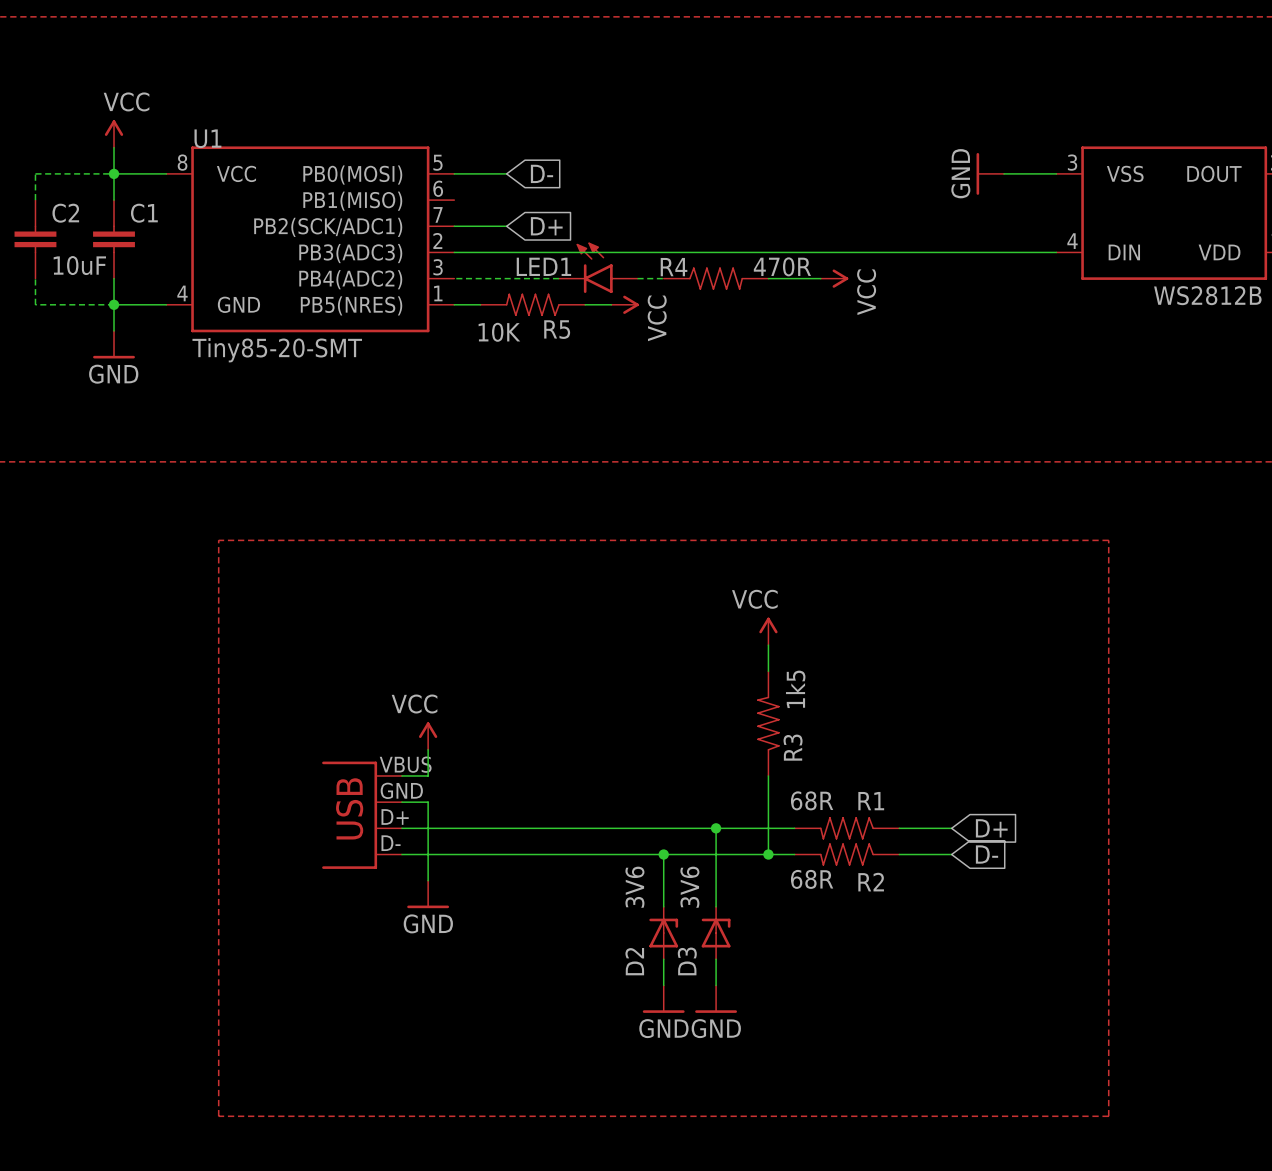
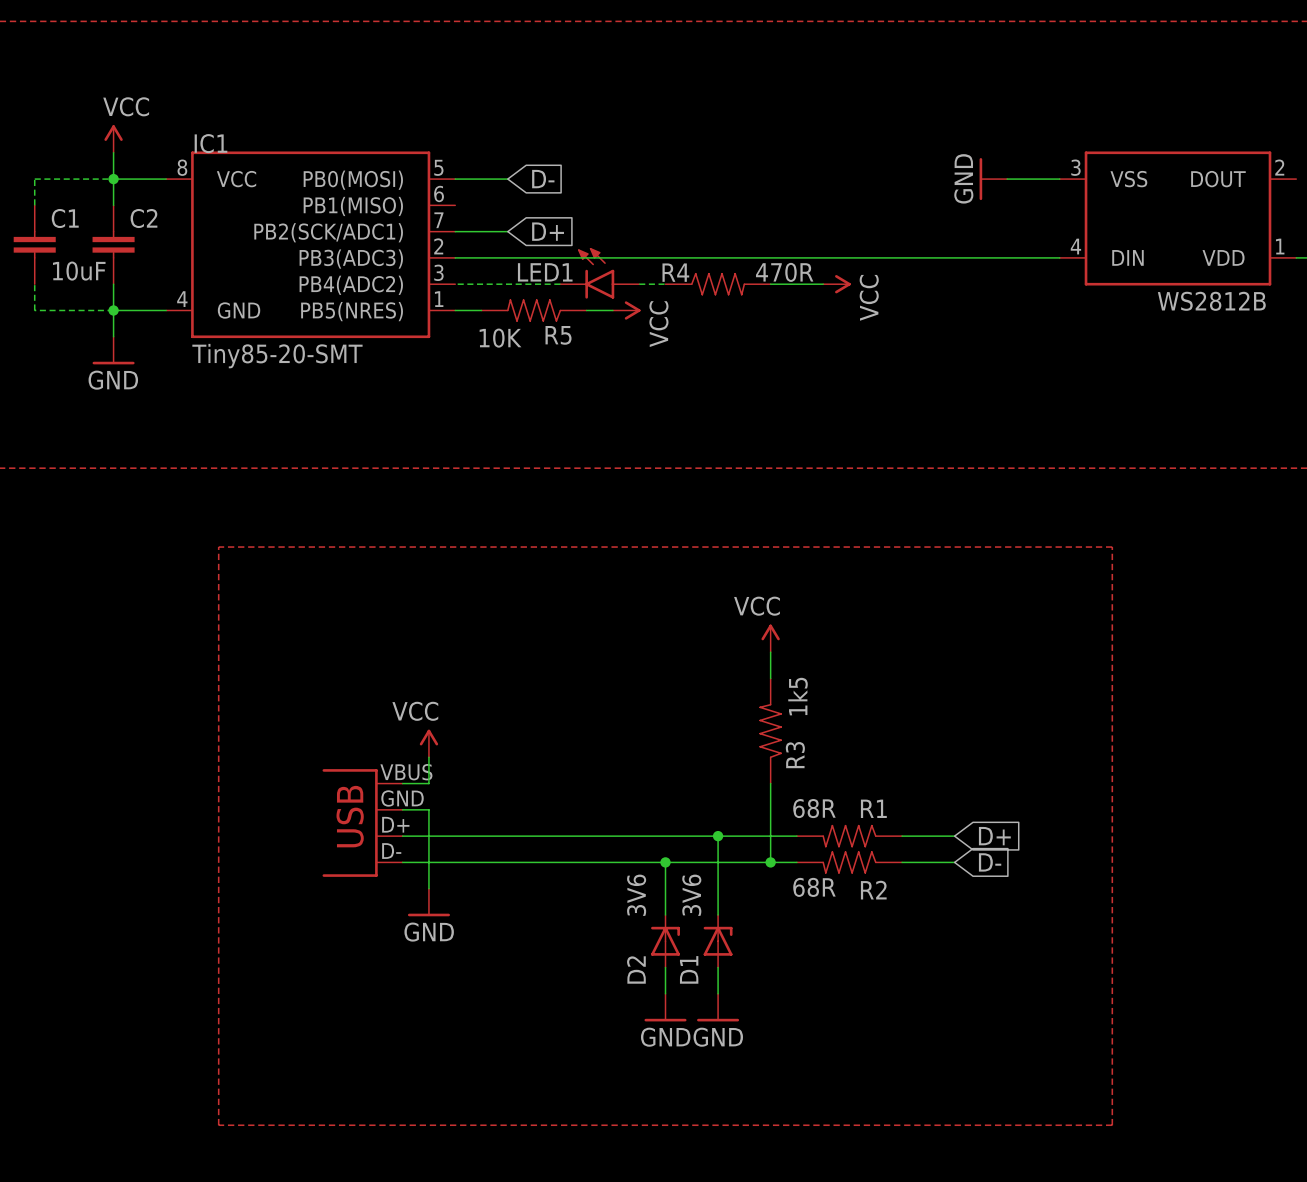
U1 name: U1 (207, 138) -> IC1 (210, 143)
C2 name: C2 (65, 213) -> C1 (65, 218)
C1 name: C1 (144, 213) -> C2 (143, 218)
D3 name: D3 (687, 961) -> D1 (689, 969)

